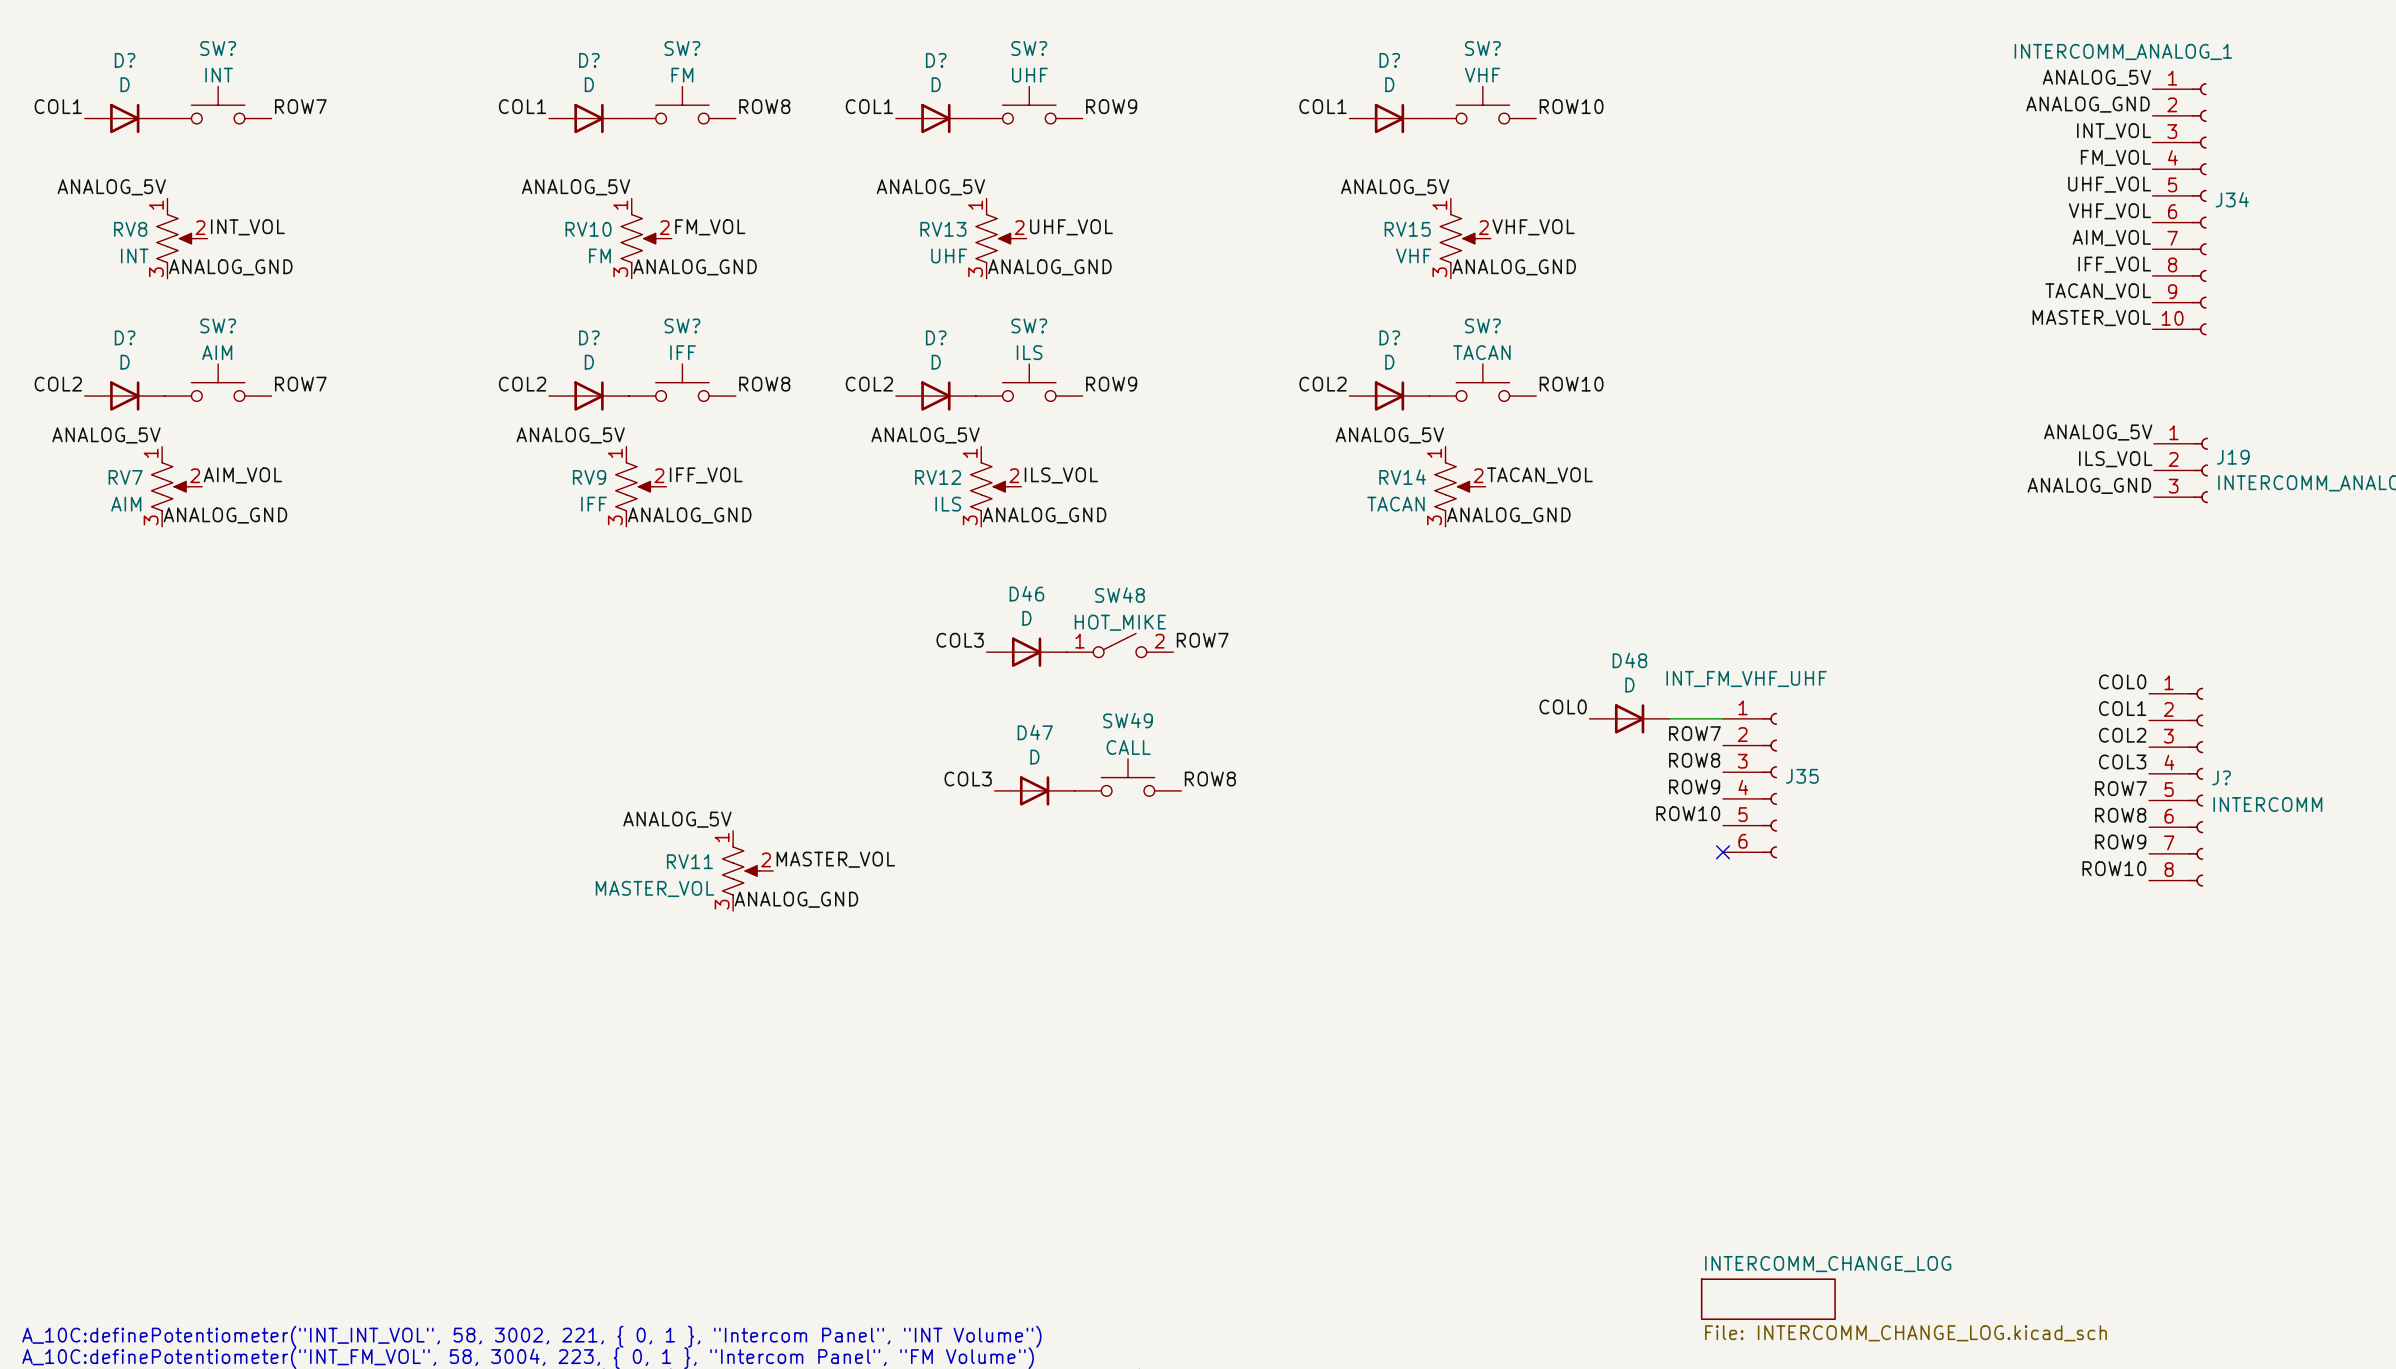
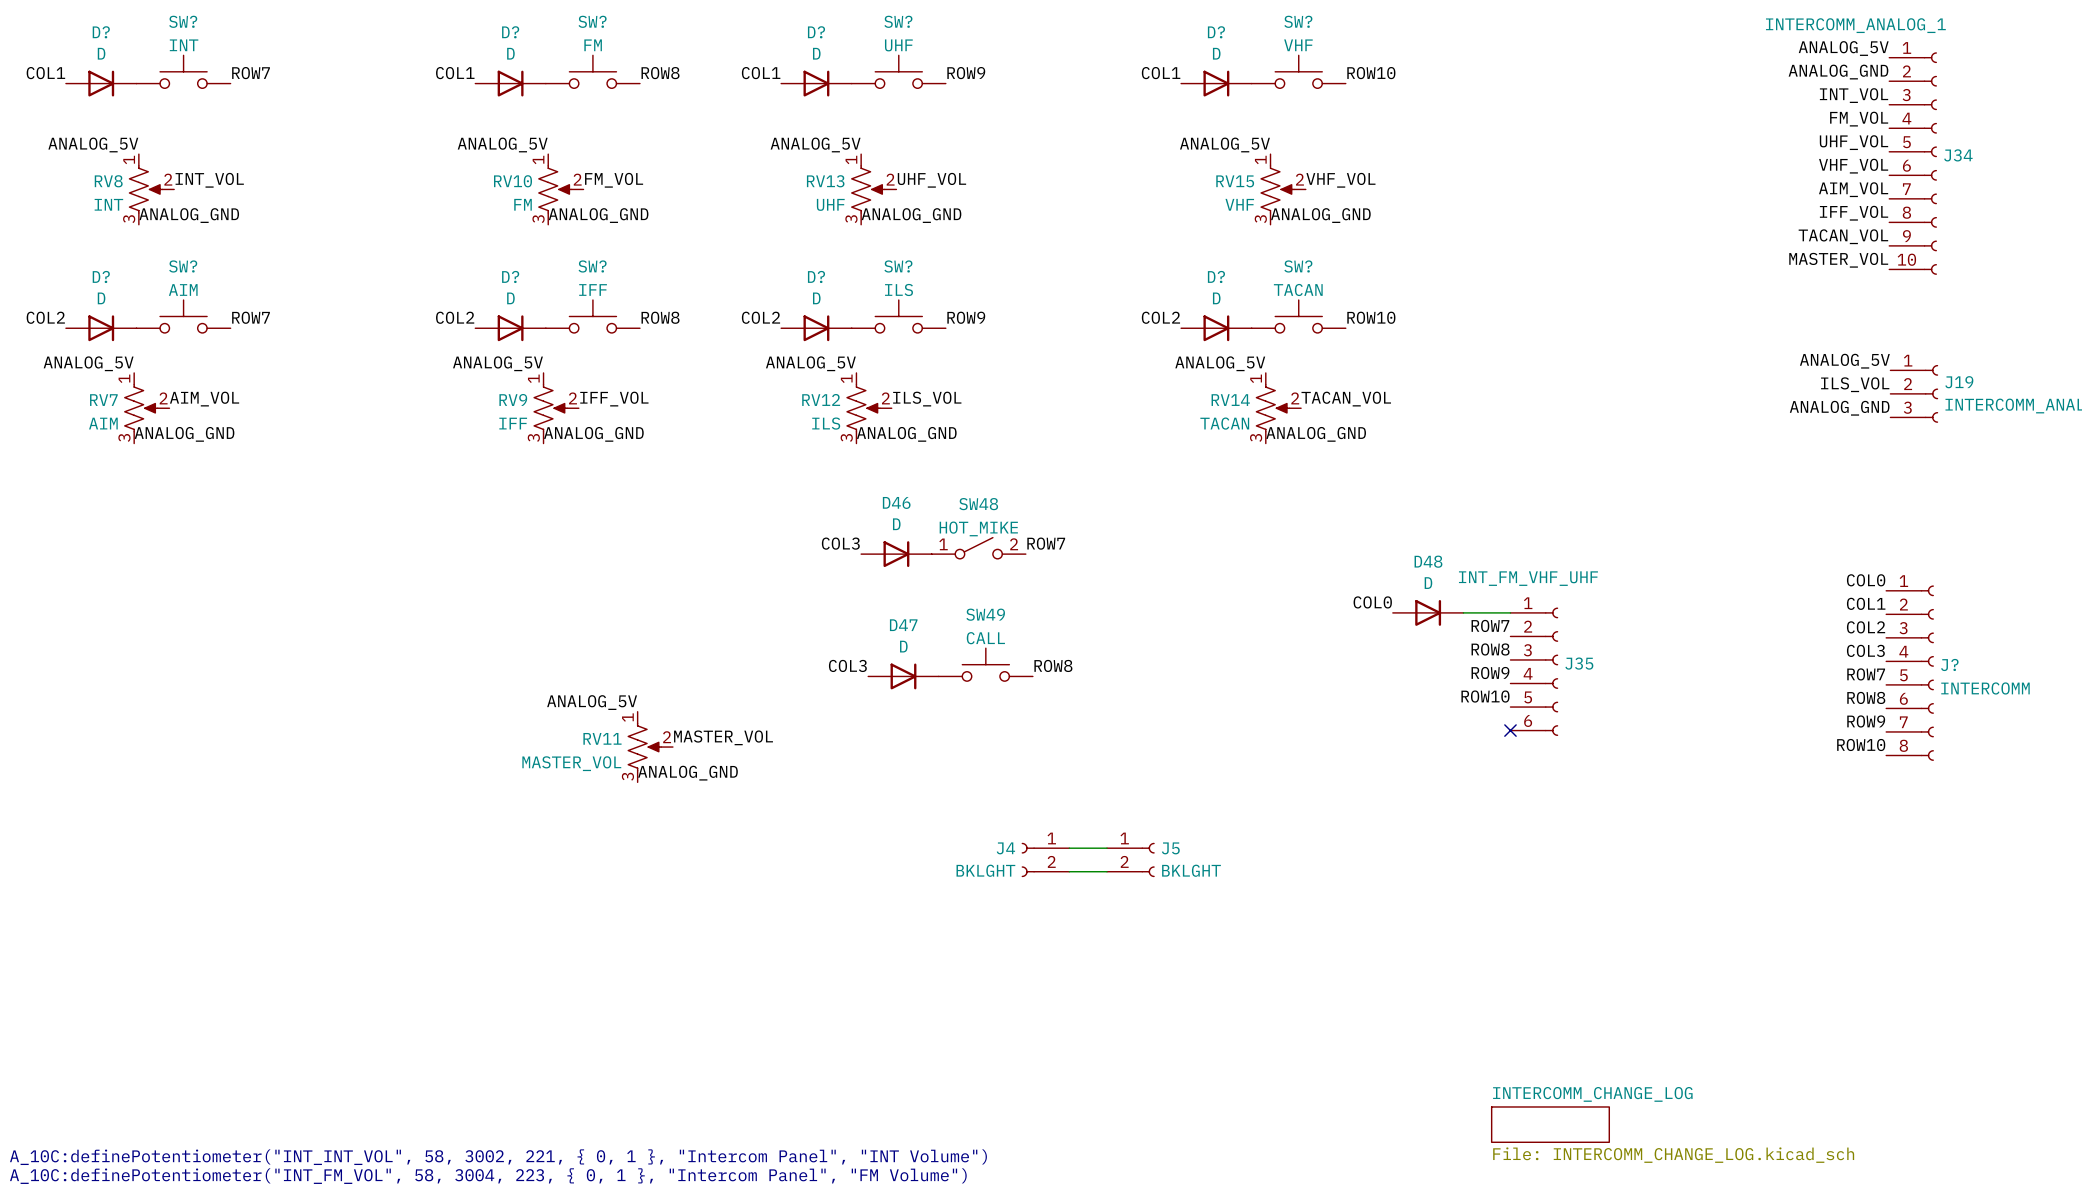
wire: none -> (1069, 848) (1106, 848)
J4: none -> BKLGHT (1045, 859)
J5: none -> BKLGHT (1130, 859)
wire: none -> (1069, 871) (1106, 871)

